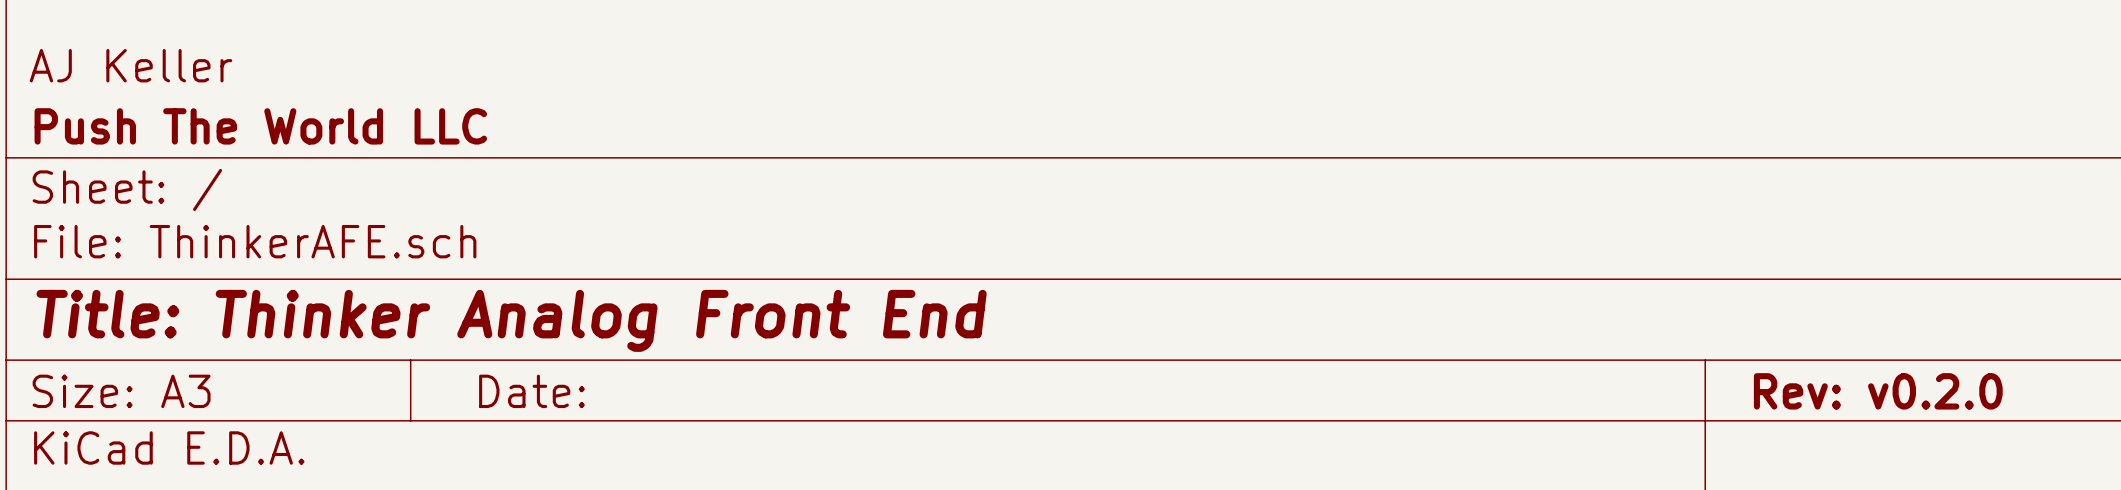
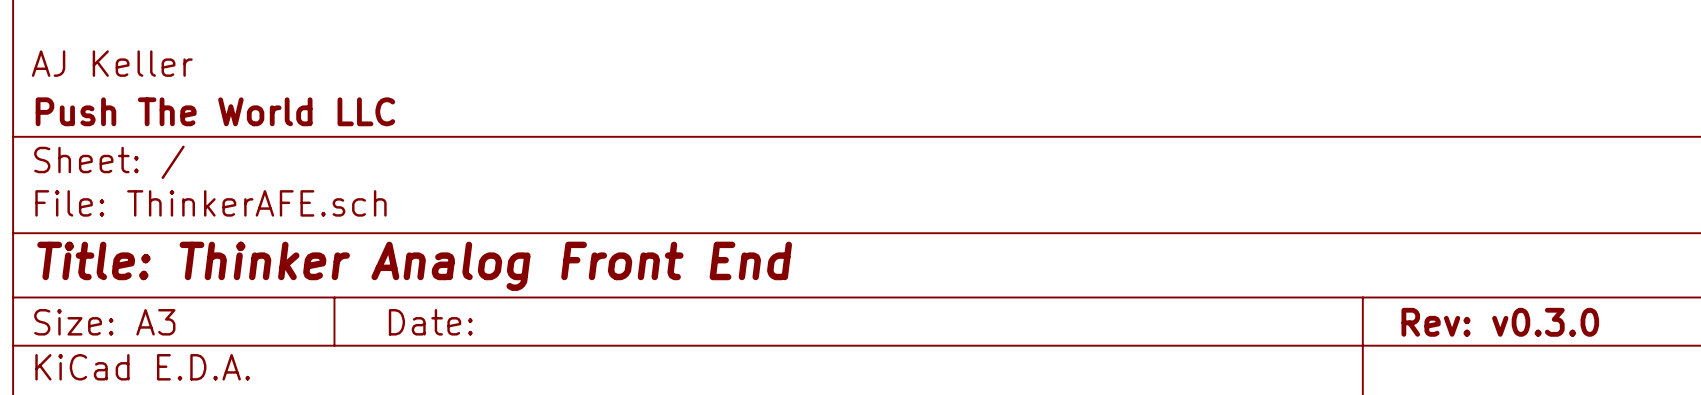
title block: Rev: v0.2.0 (1878, 391) -> Rev: v0.3.0 (1500, 322)

